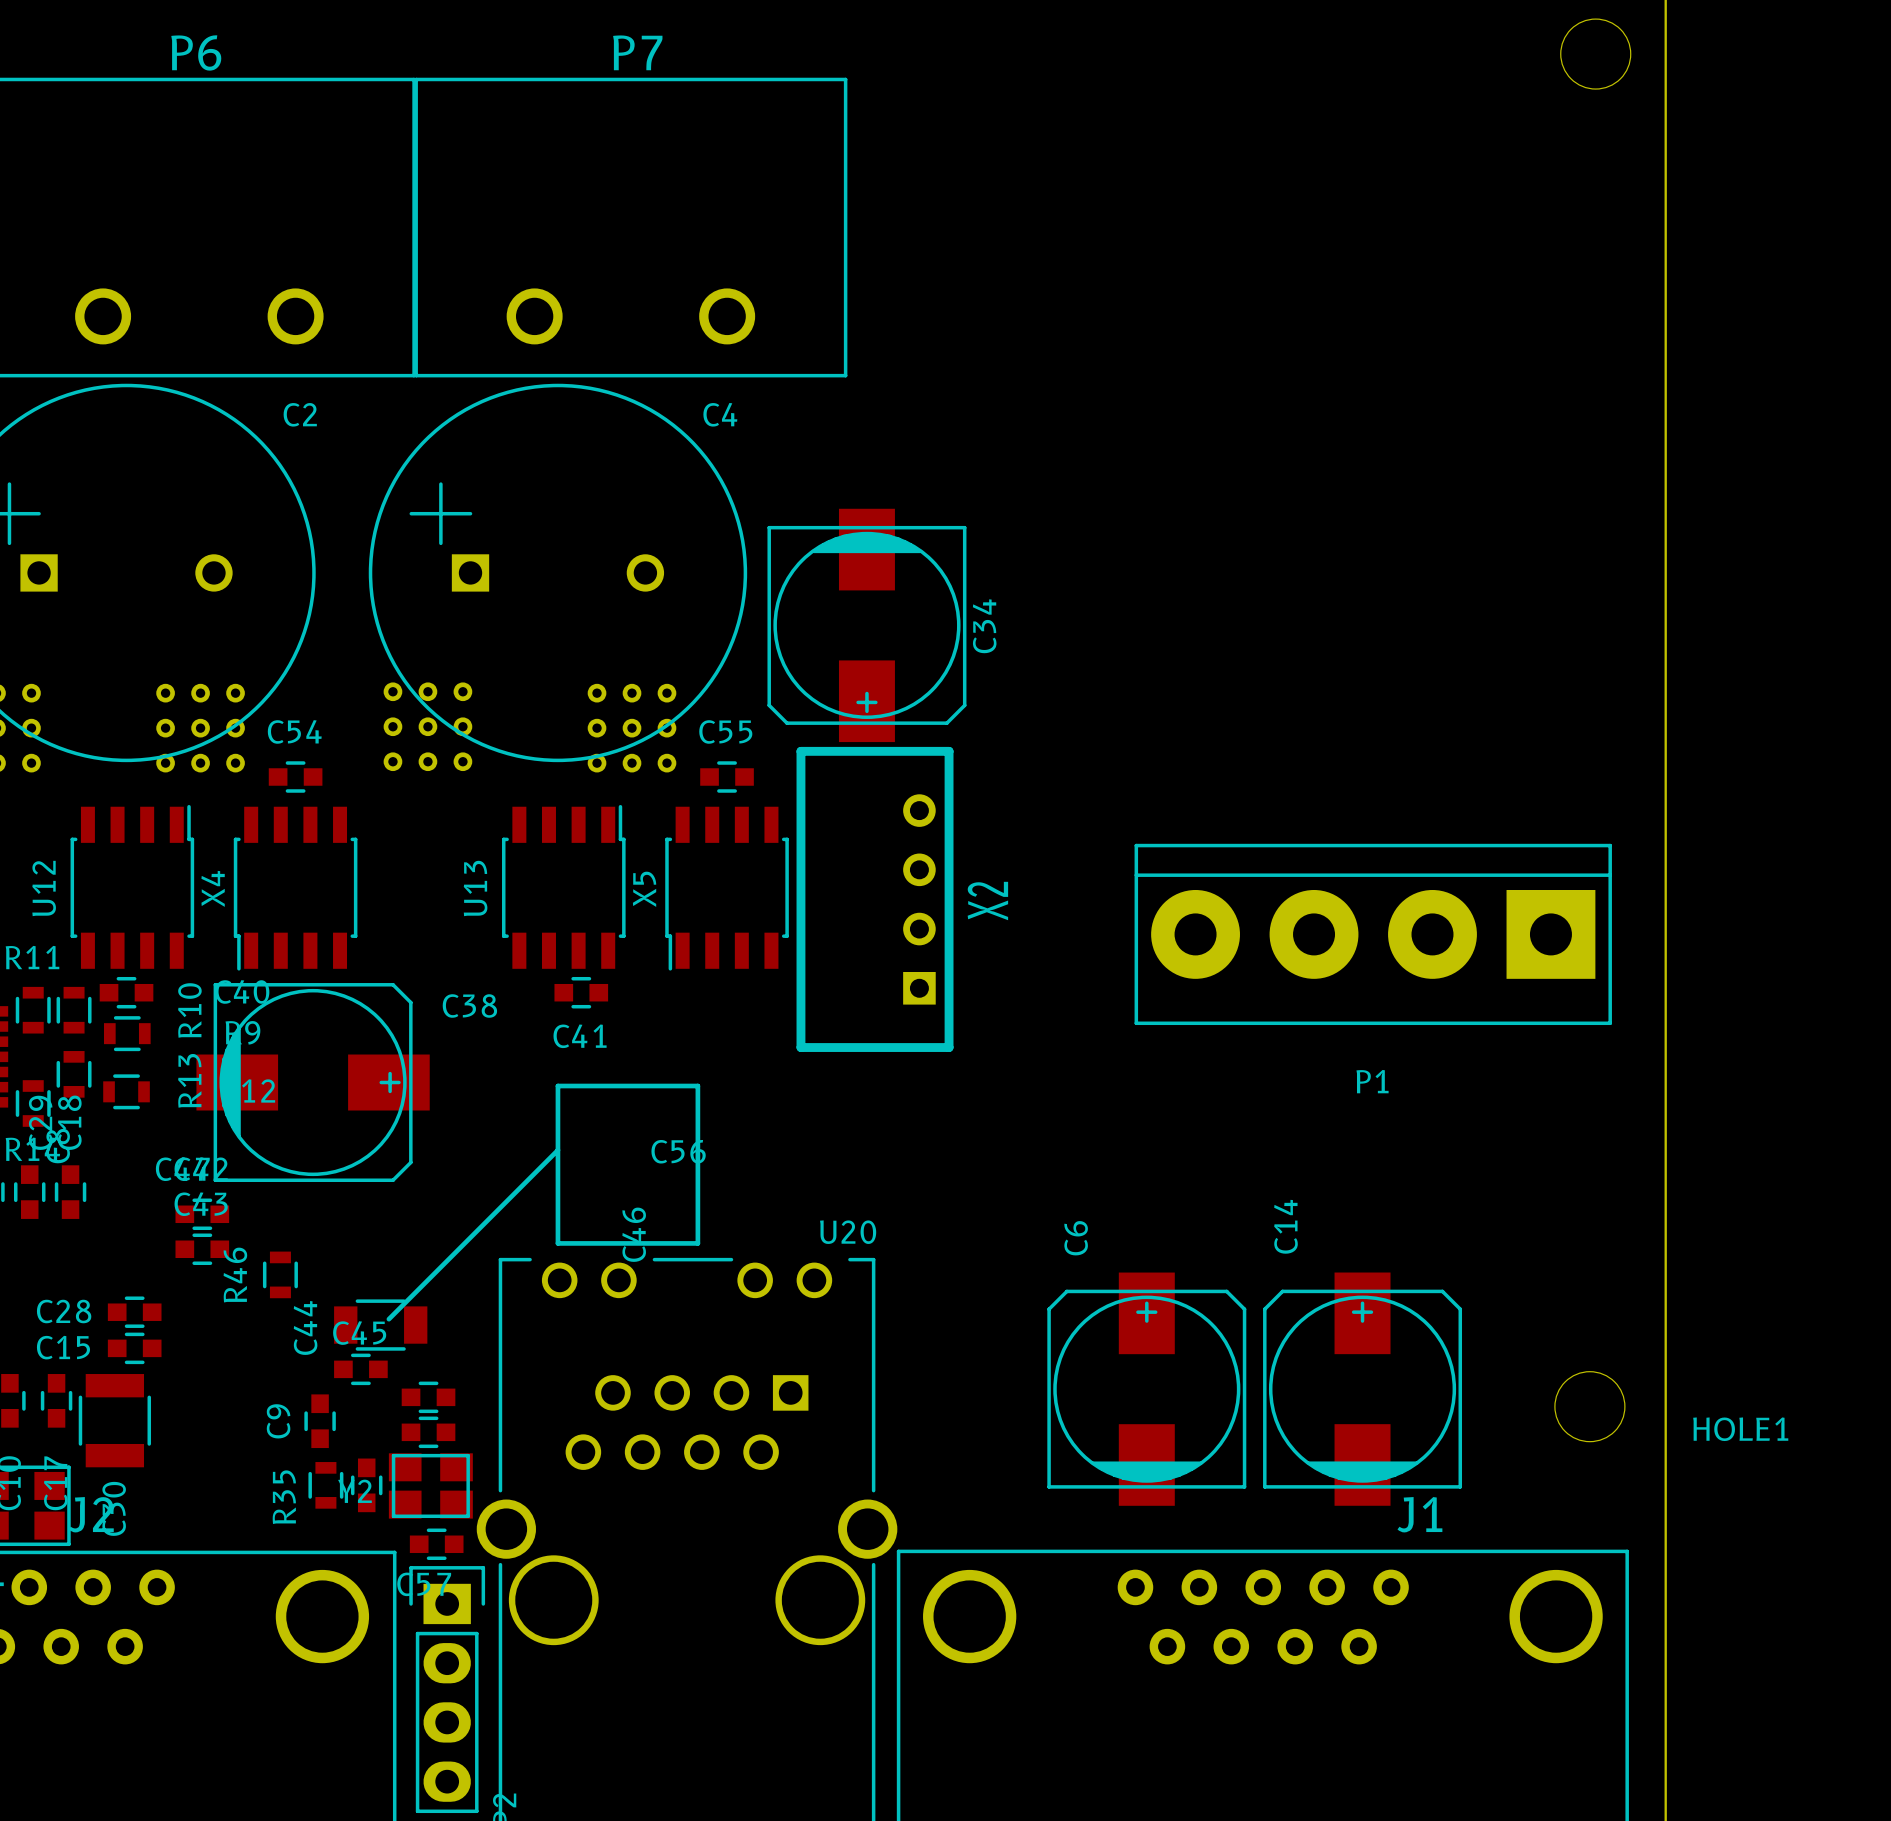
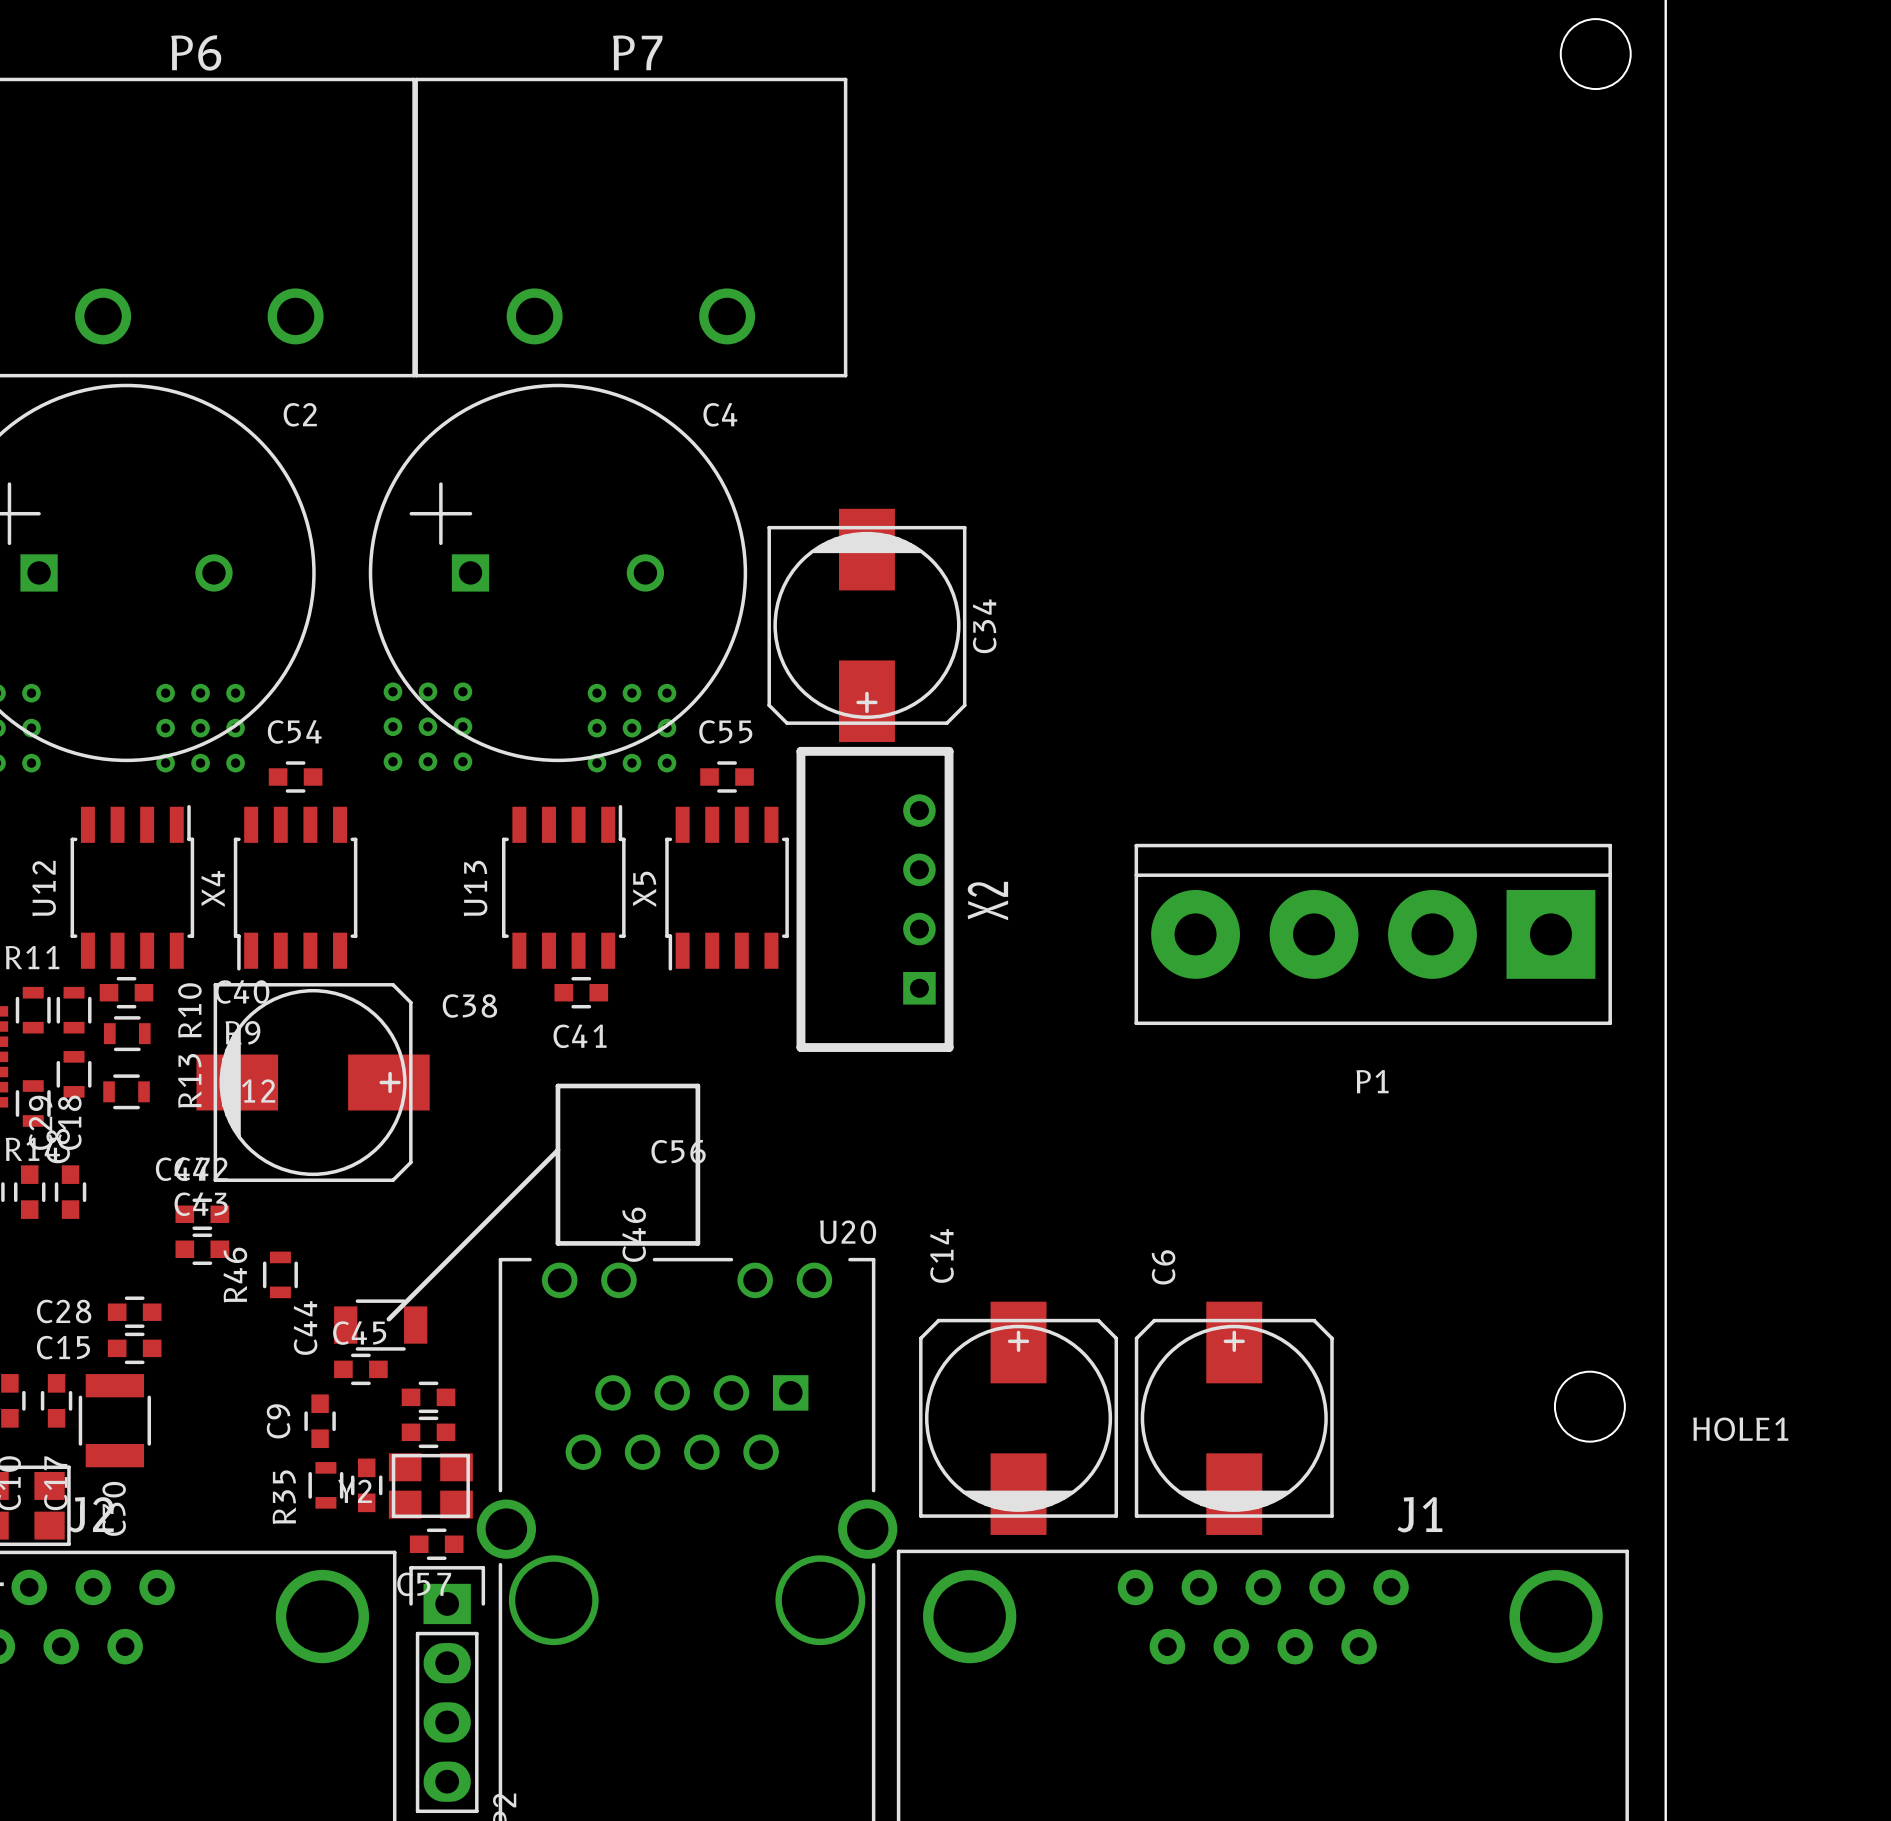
C6 position: (1146, 1389) -> (1234, 1418)
C14 position: (1362, 1389) -> (1018, 1418)

